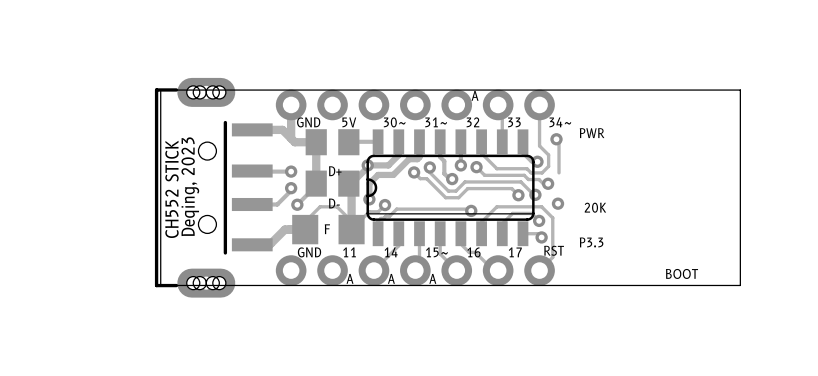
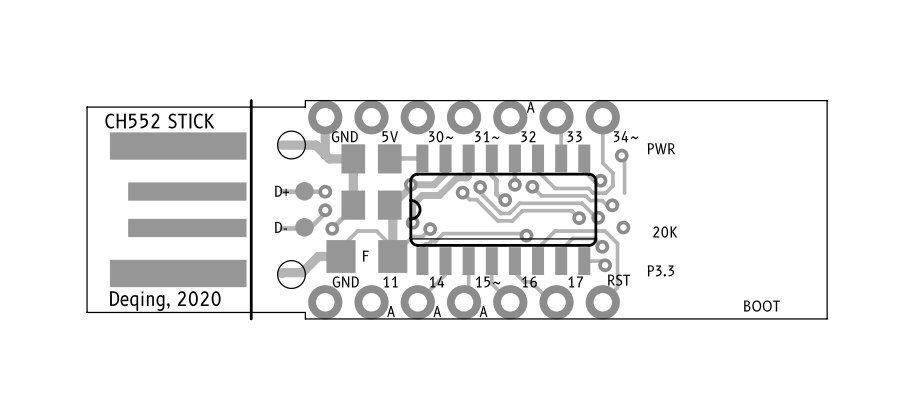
line: none -> (251, 100) (251, 318)
board edge: (273, 90) (160, 90) (160, 285) (273, 285) -> (305, 100) (305, 107) (87, 107) (87, 312) (305, 312) (305, 318)
round board edge: none -> [277, 131, 306, 160]
part: none -> (304, 191)
text position: D+ (335, 171) -> D+ (282, 191)
text: Deqing, 2023 (190, 186) -> none
part: none -> (178, 209)
part: (213, 187) -> none
text rotation: 0° (171, 189) -> 90° clockwise (159, 121)
part: none -> (304, 227)
text position: D- (334, 203) -> D- (281, 227)
round board edge: none -> [277, 260, 306, 289]
text: none -> Deqing, 2020 (165, 301)

